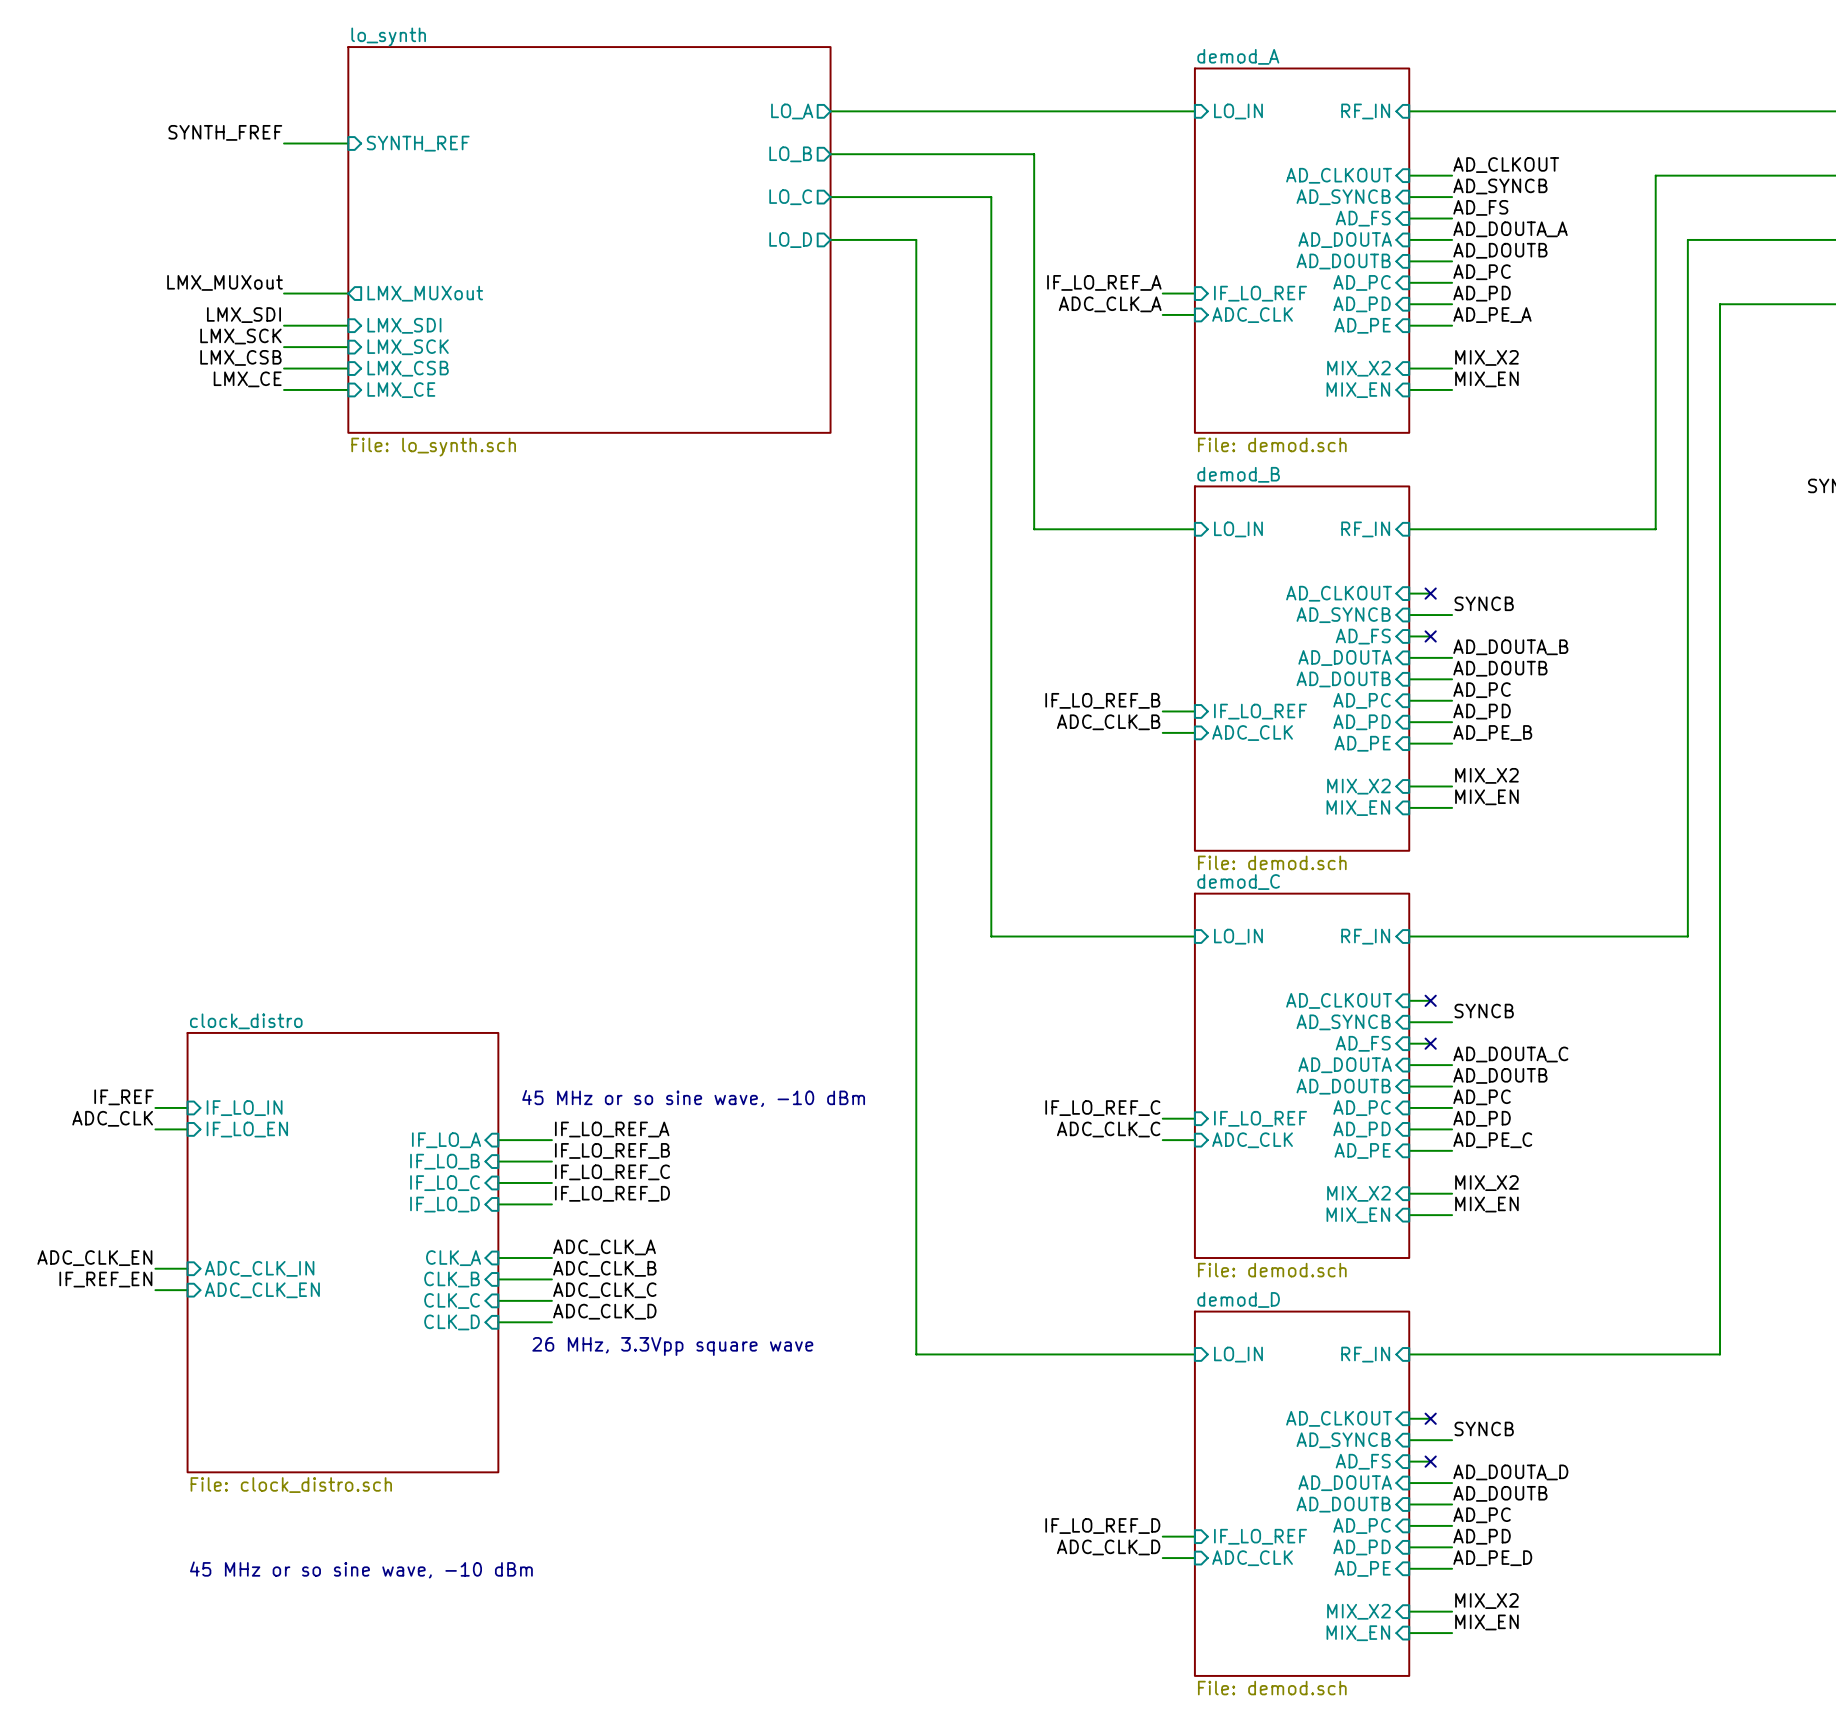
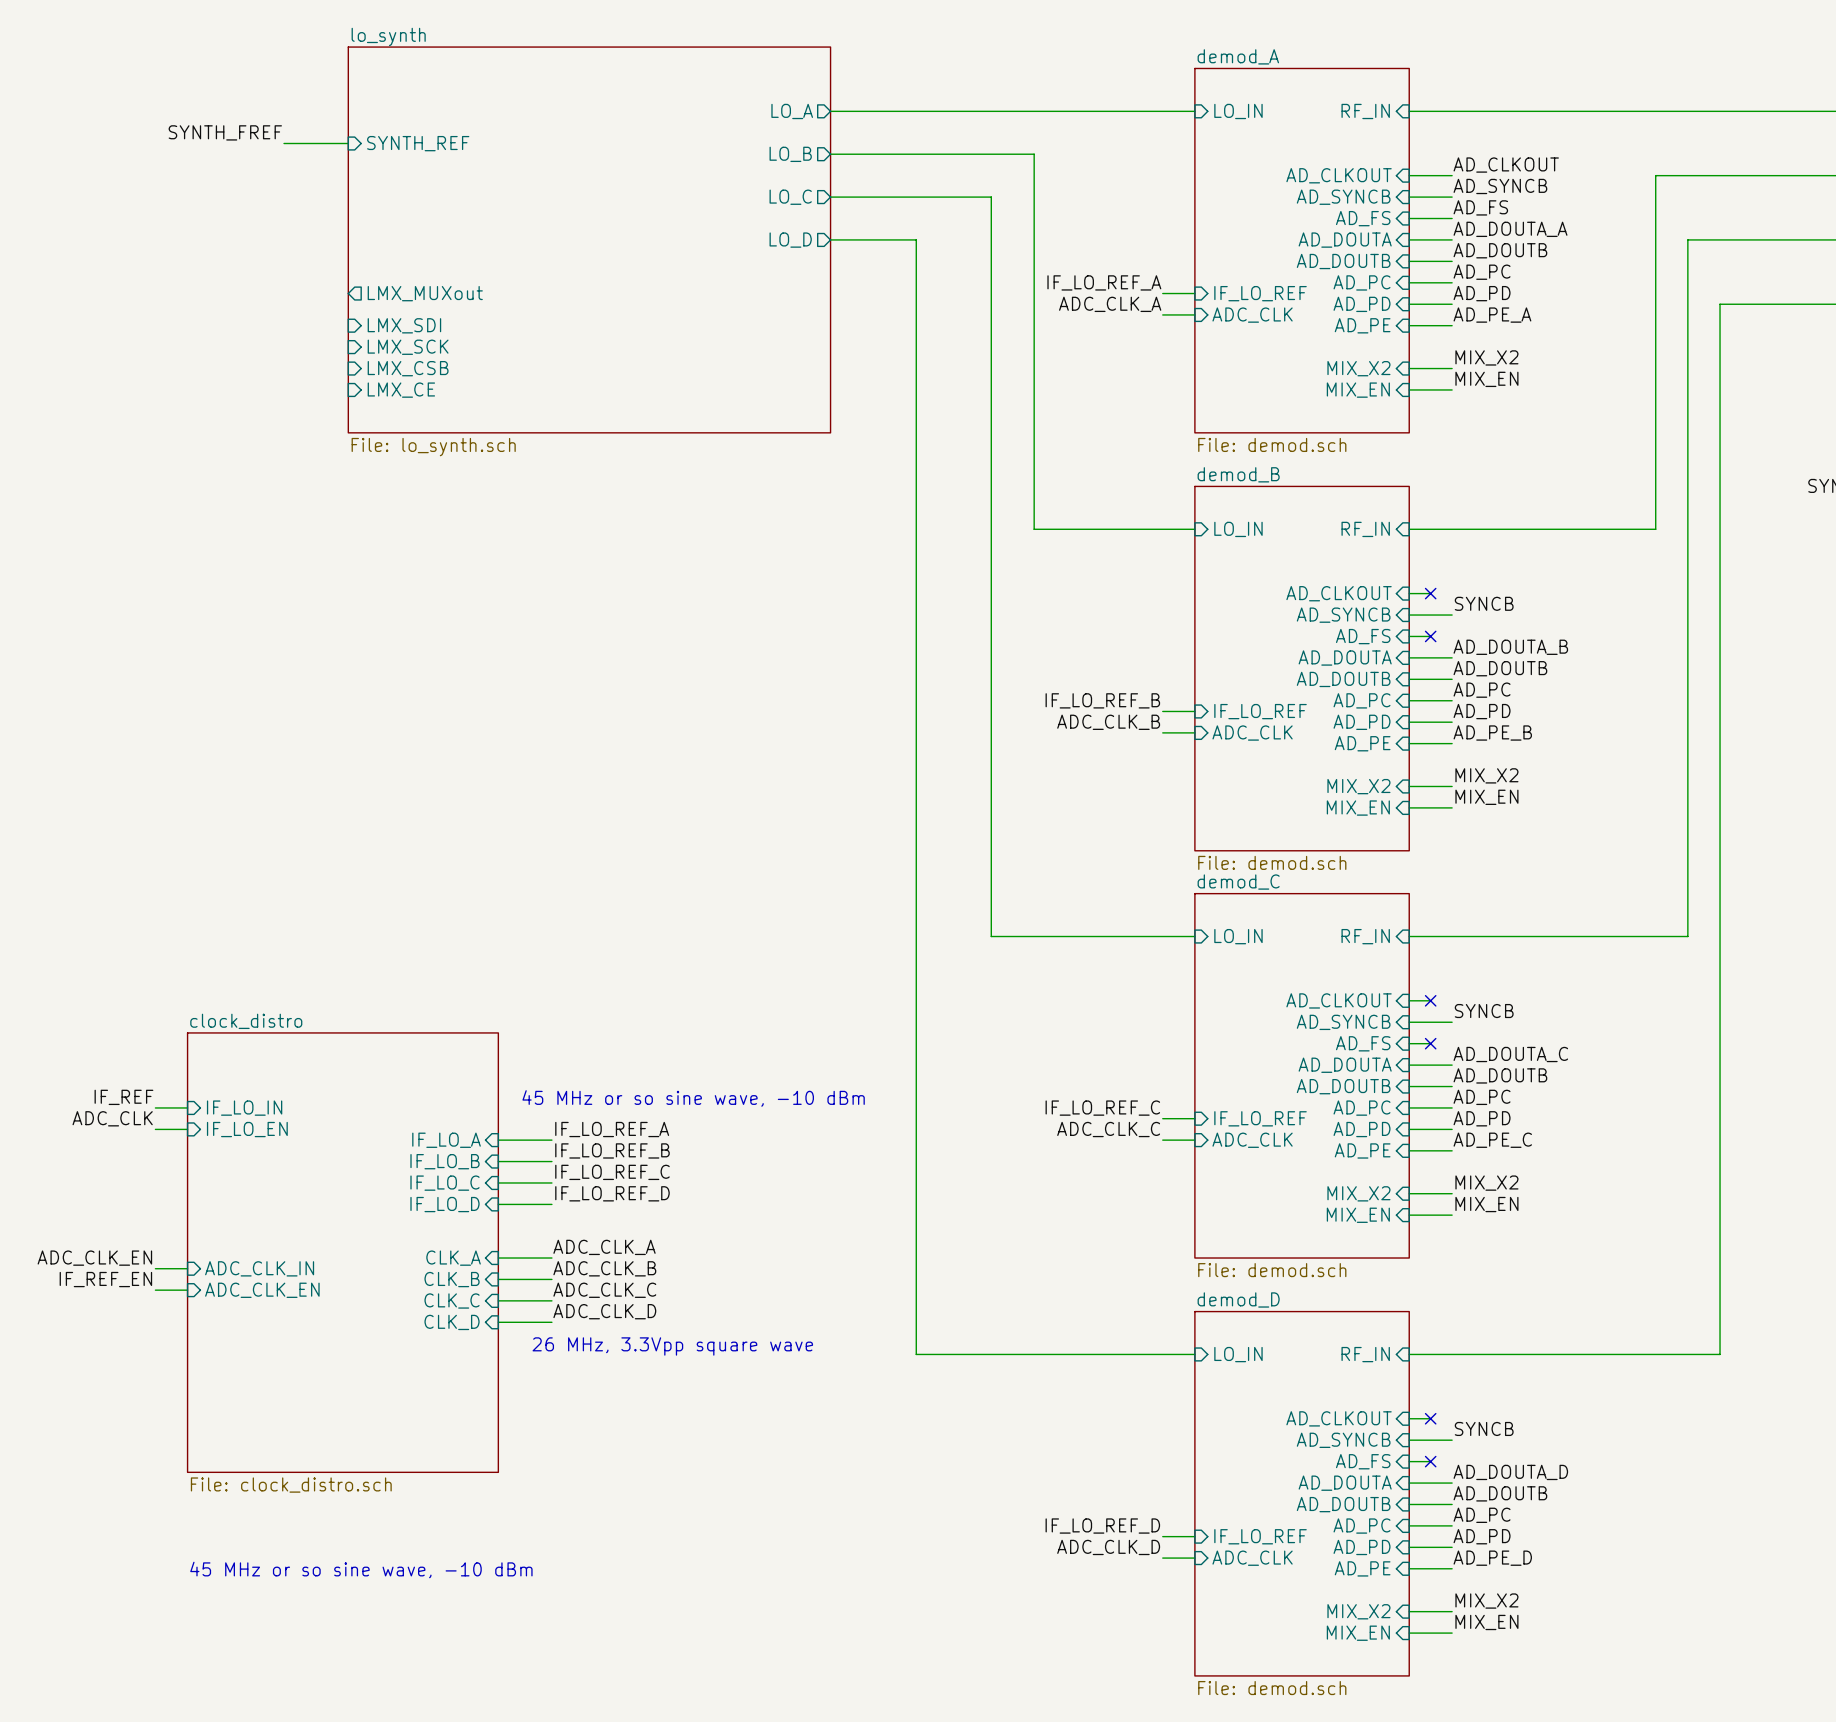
label: LMX_MUXout (224, 282) -> none
wire: (284, 293) (348, 293) -> none
label: LMX_SDI (243, 315) -> none
wire: (284, 325) (348, 325) -> none
label: LMX_SCK (240, 336) -> none
wire: (284, 347) (348, 347) -> none
label: LMX_CSB (240, 357) -> none
wire: (284, 368) (348, 368) -> none
label: LMX_CE (247, 379) -> none
wire: (284, 389) (348, 389) -> none

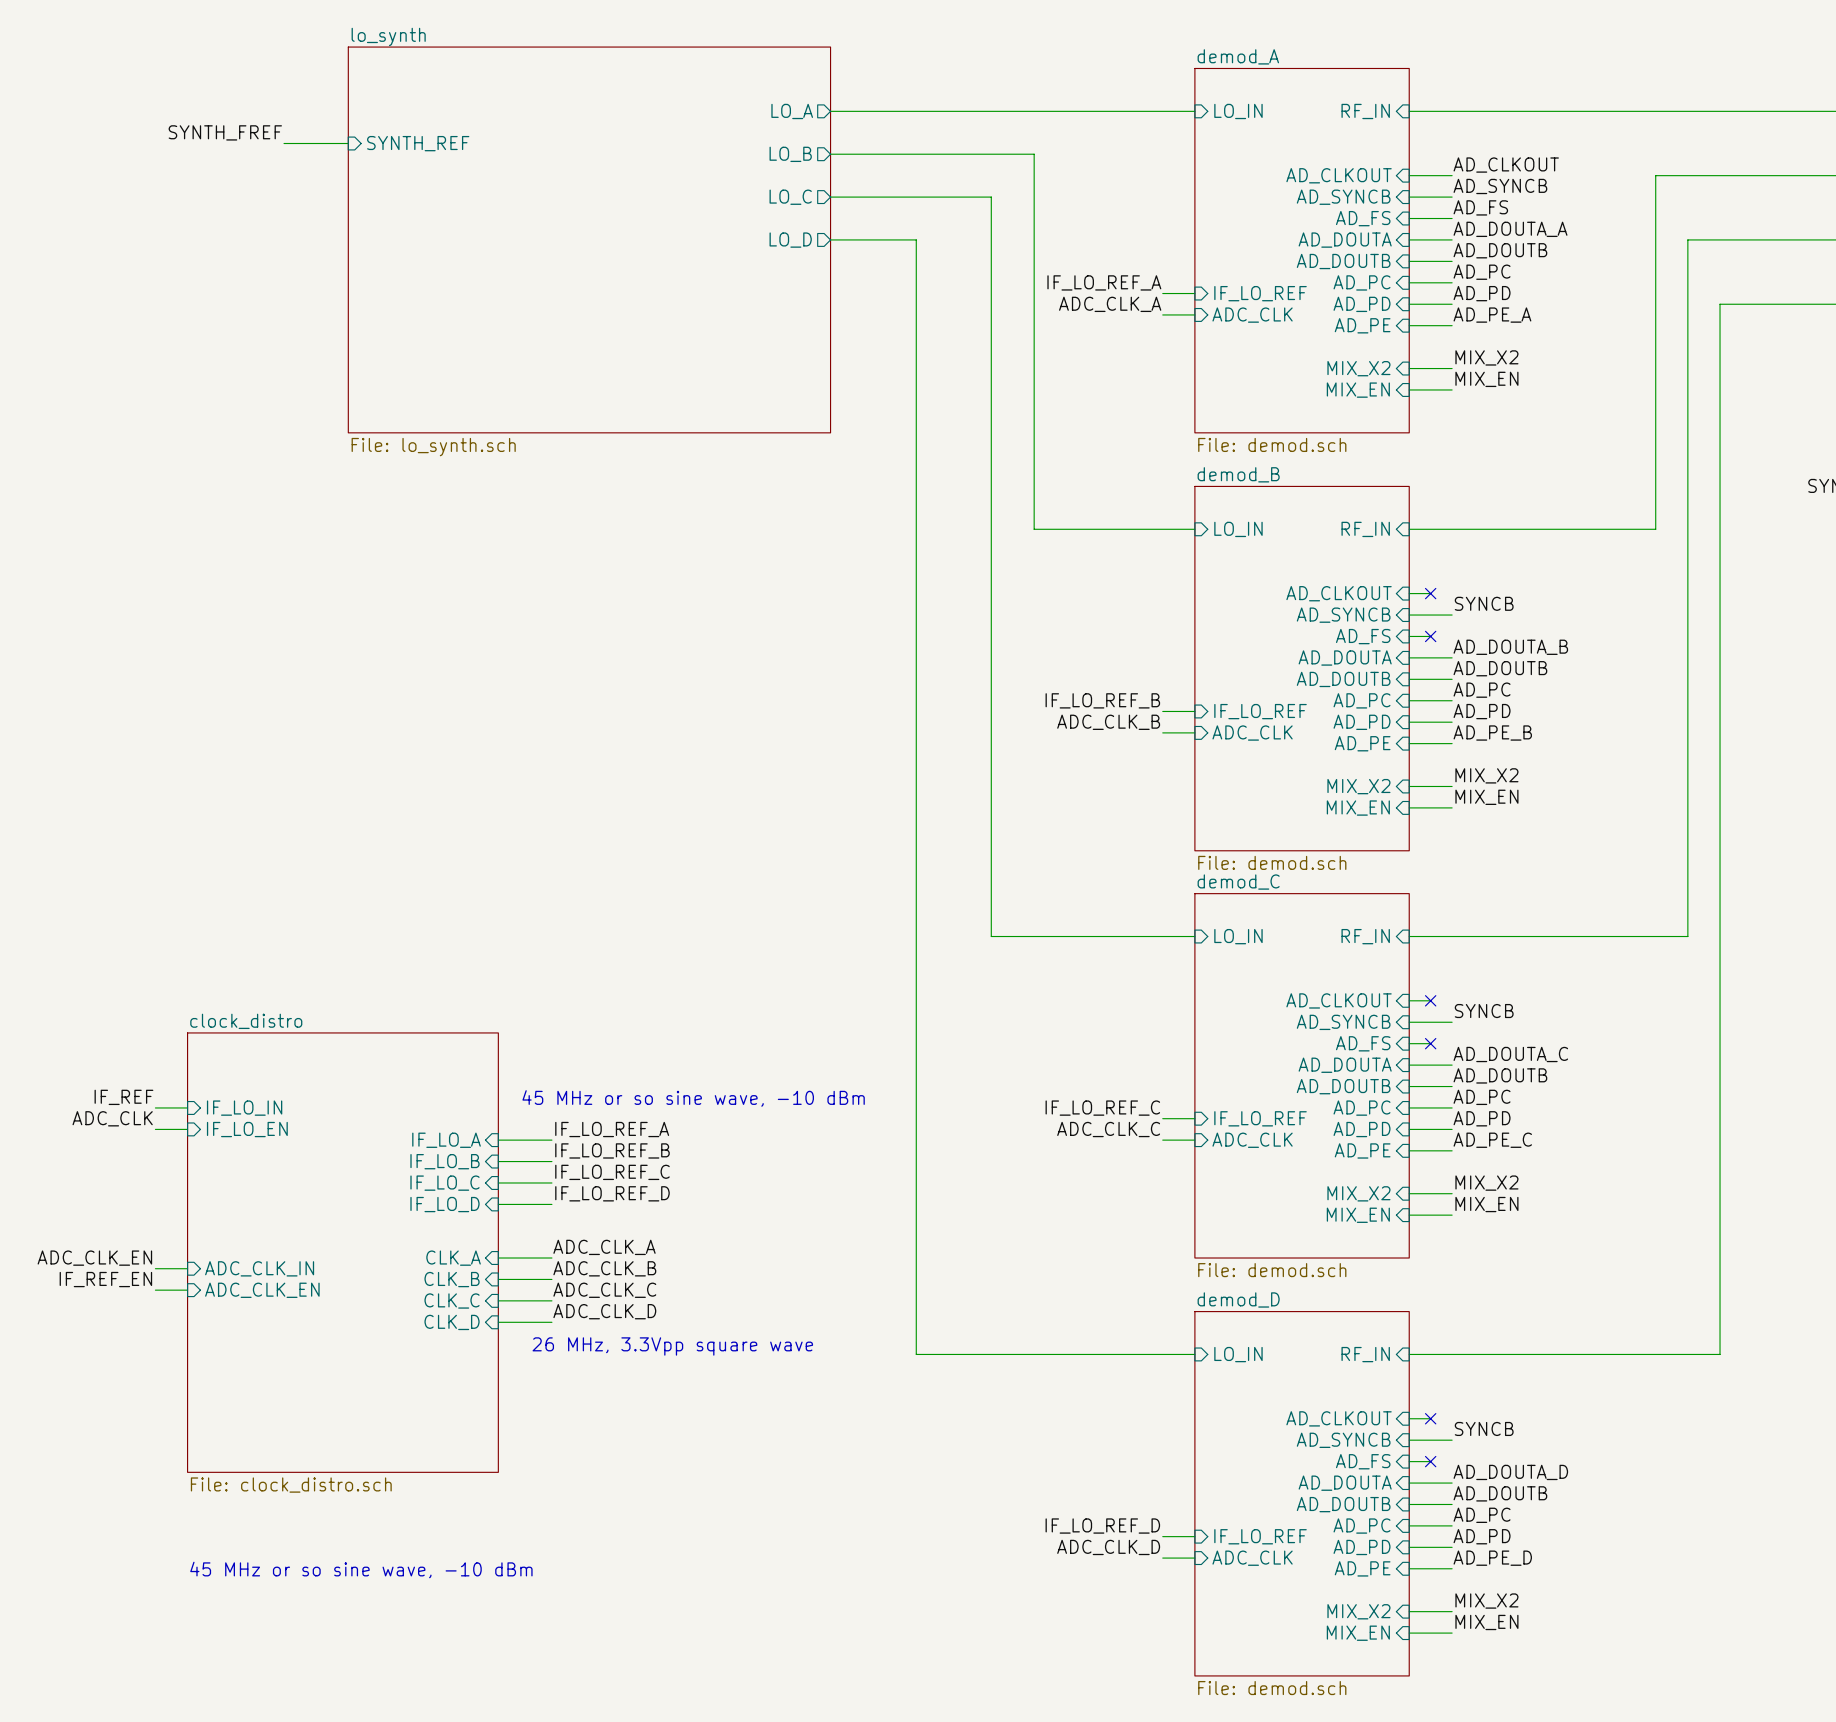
sheet pin: LMX_MUXout (425, 293) -> none
sheet pin: LMX_SDI (404, 325) -> none
sheet pin: LMX_SCK (408, 347) -> none
sheet pin: LMX_CSB (408, 368) -> none
sheet pin: LMX_CE (401, 390) -> none

